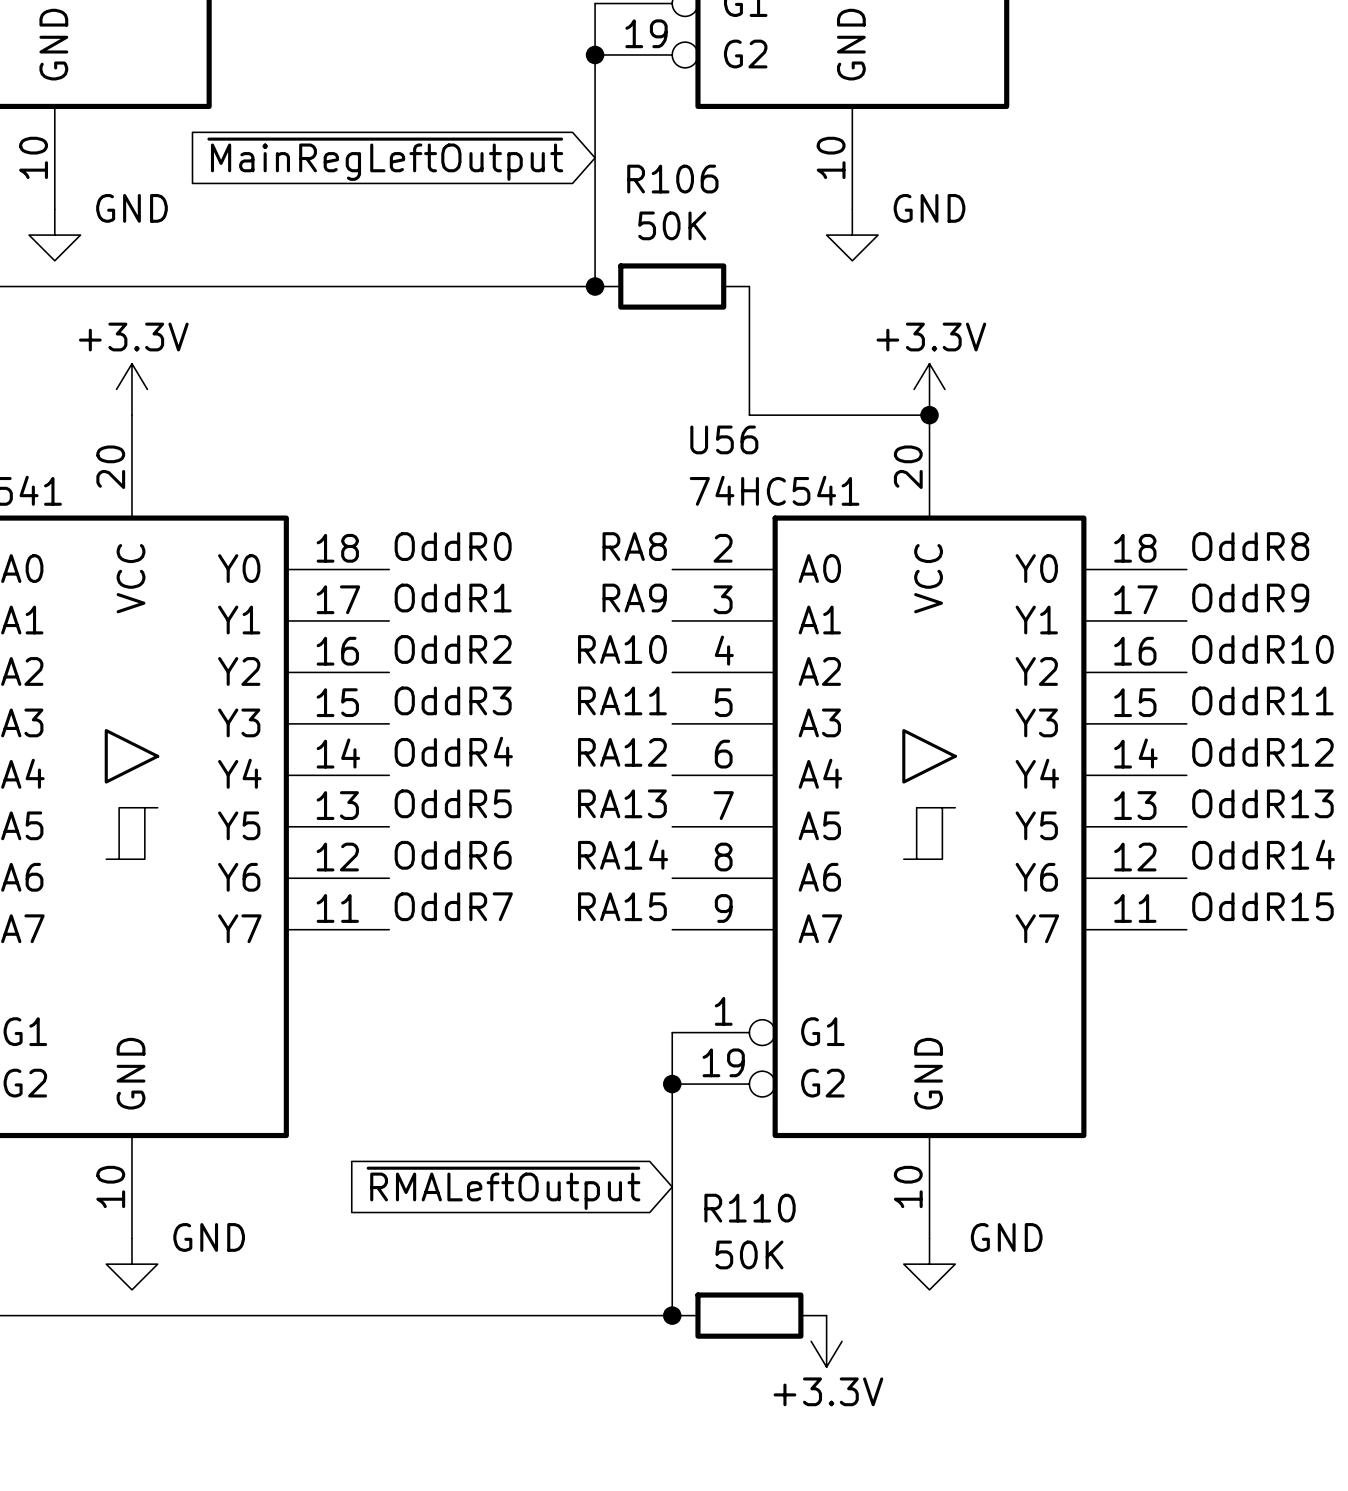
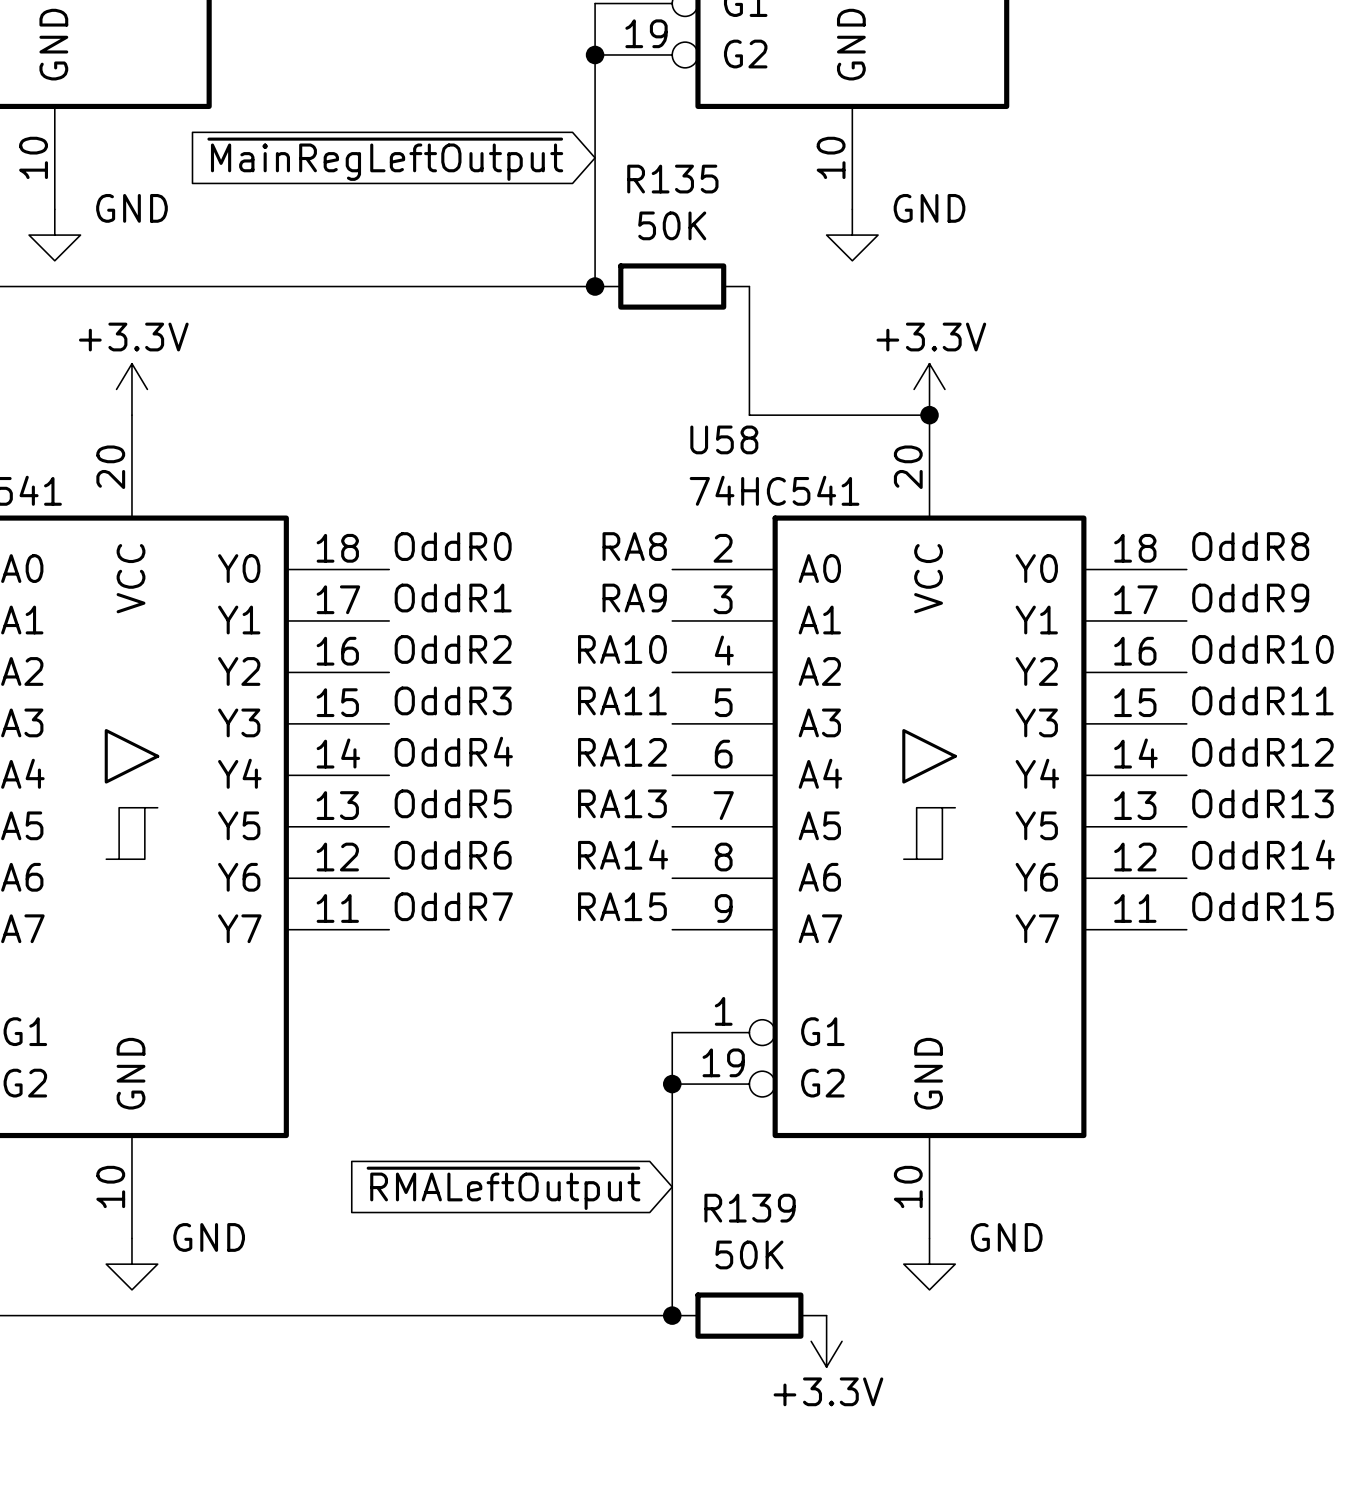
R106 name: R106 (672, 179) -> R135 (672, 179)
U56 name: U56 (724, 439) -> U58 (724, 439)
R110 name: R110 (750, 1208) -> R139 (750, 1208)

